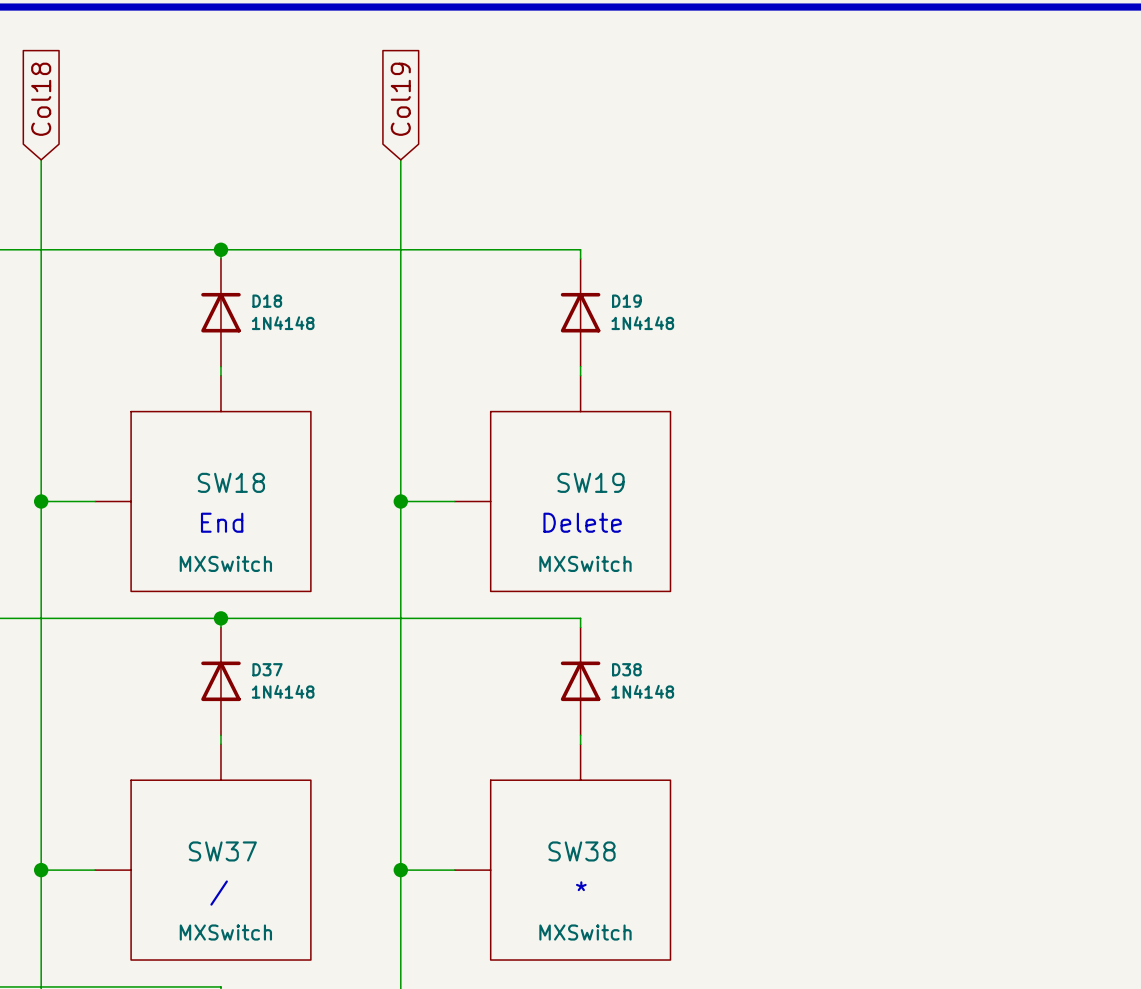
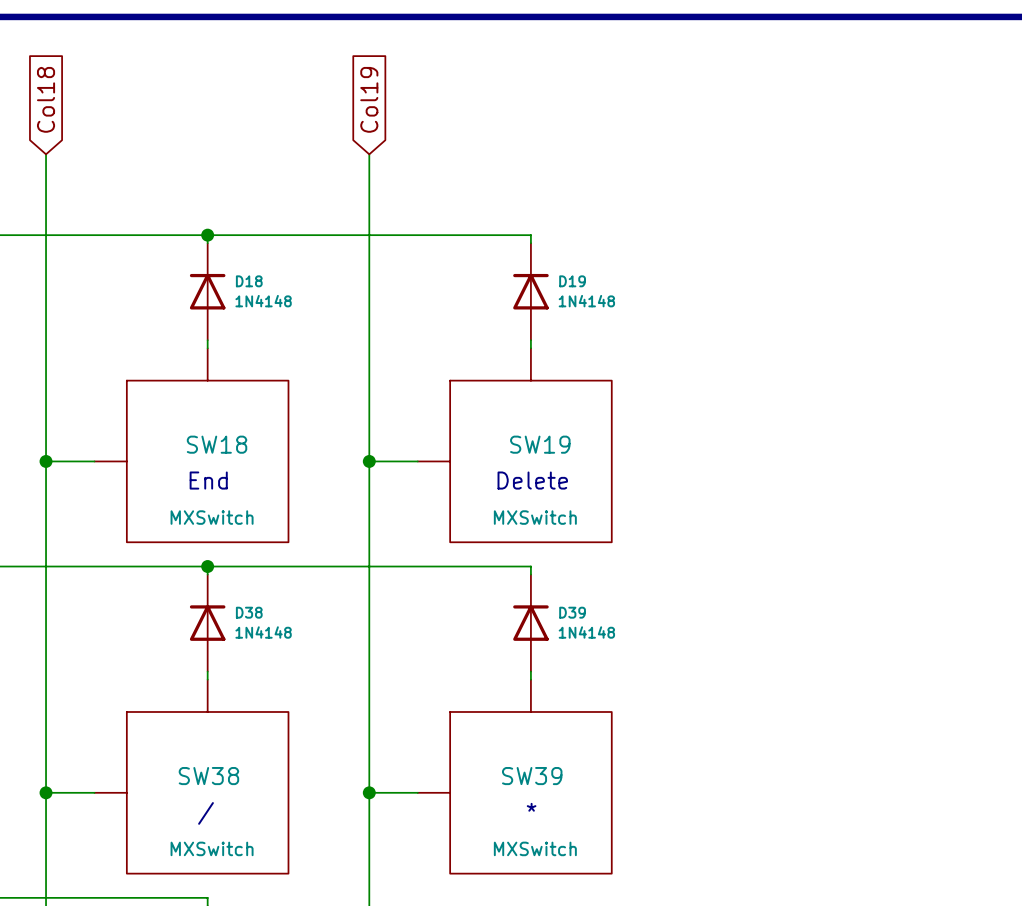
D37 name: D37 (267, 669) -> D38 (249, 612)
D38 name: D38 (626, 669) -> D39 (572, 612)
SW37 name: SW37 (222, 851) -> SW38 (208, 776)
SW38 name: SW38 (582, 851) -> SW39 (532, 776)

